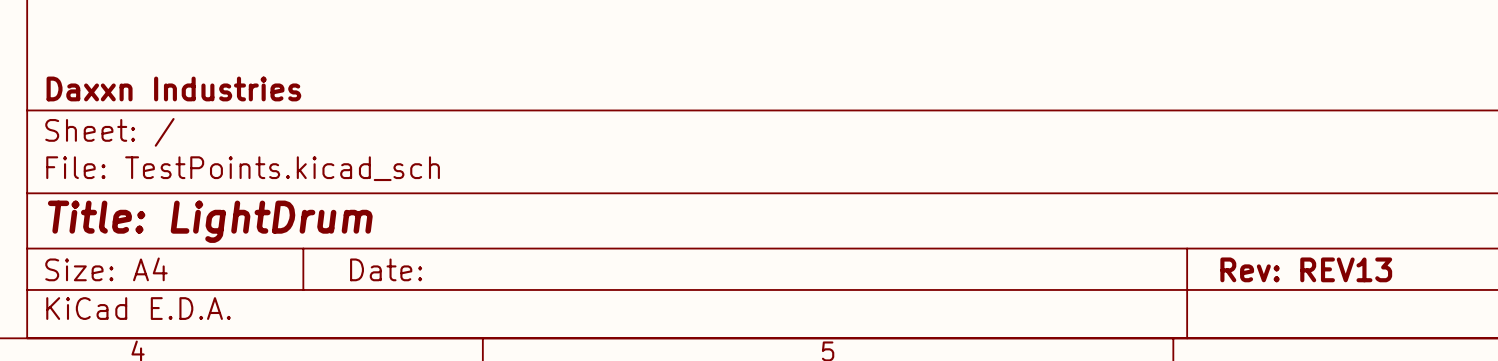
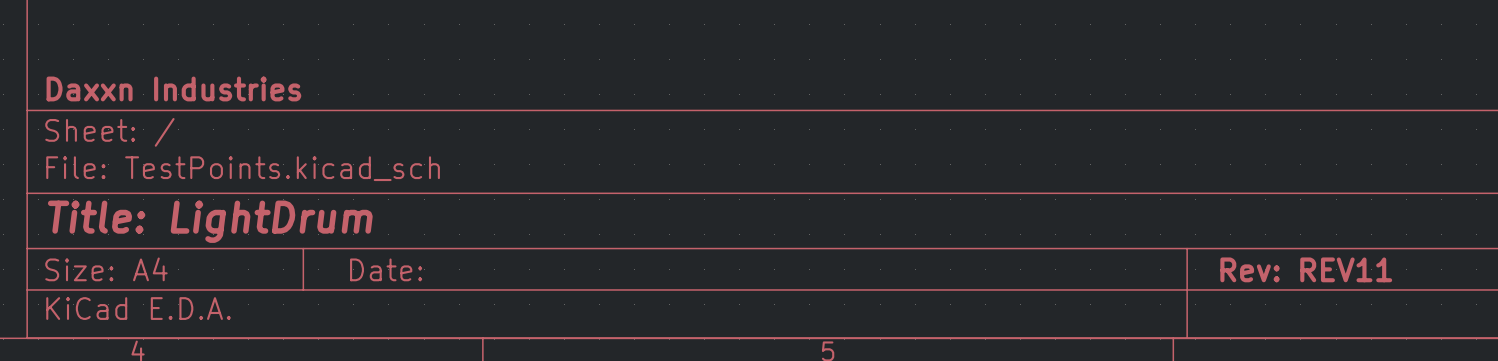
title block: Rev: REV13 (1306, 269) -> Rev: REV11 (1306, 269)

